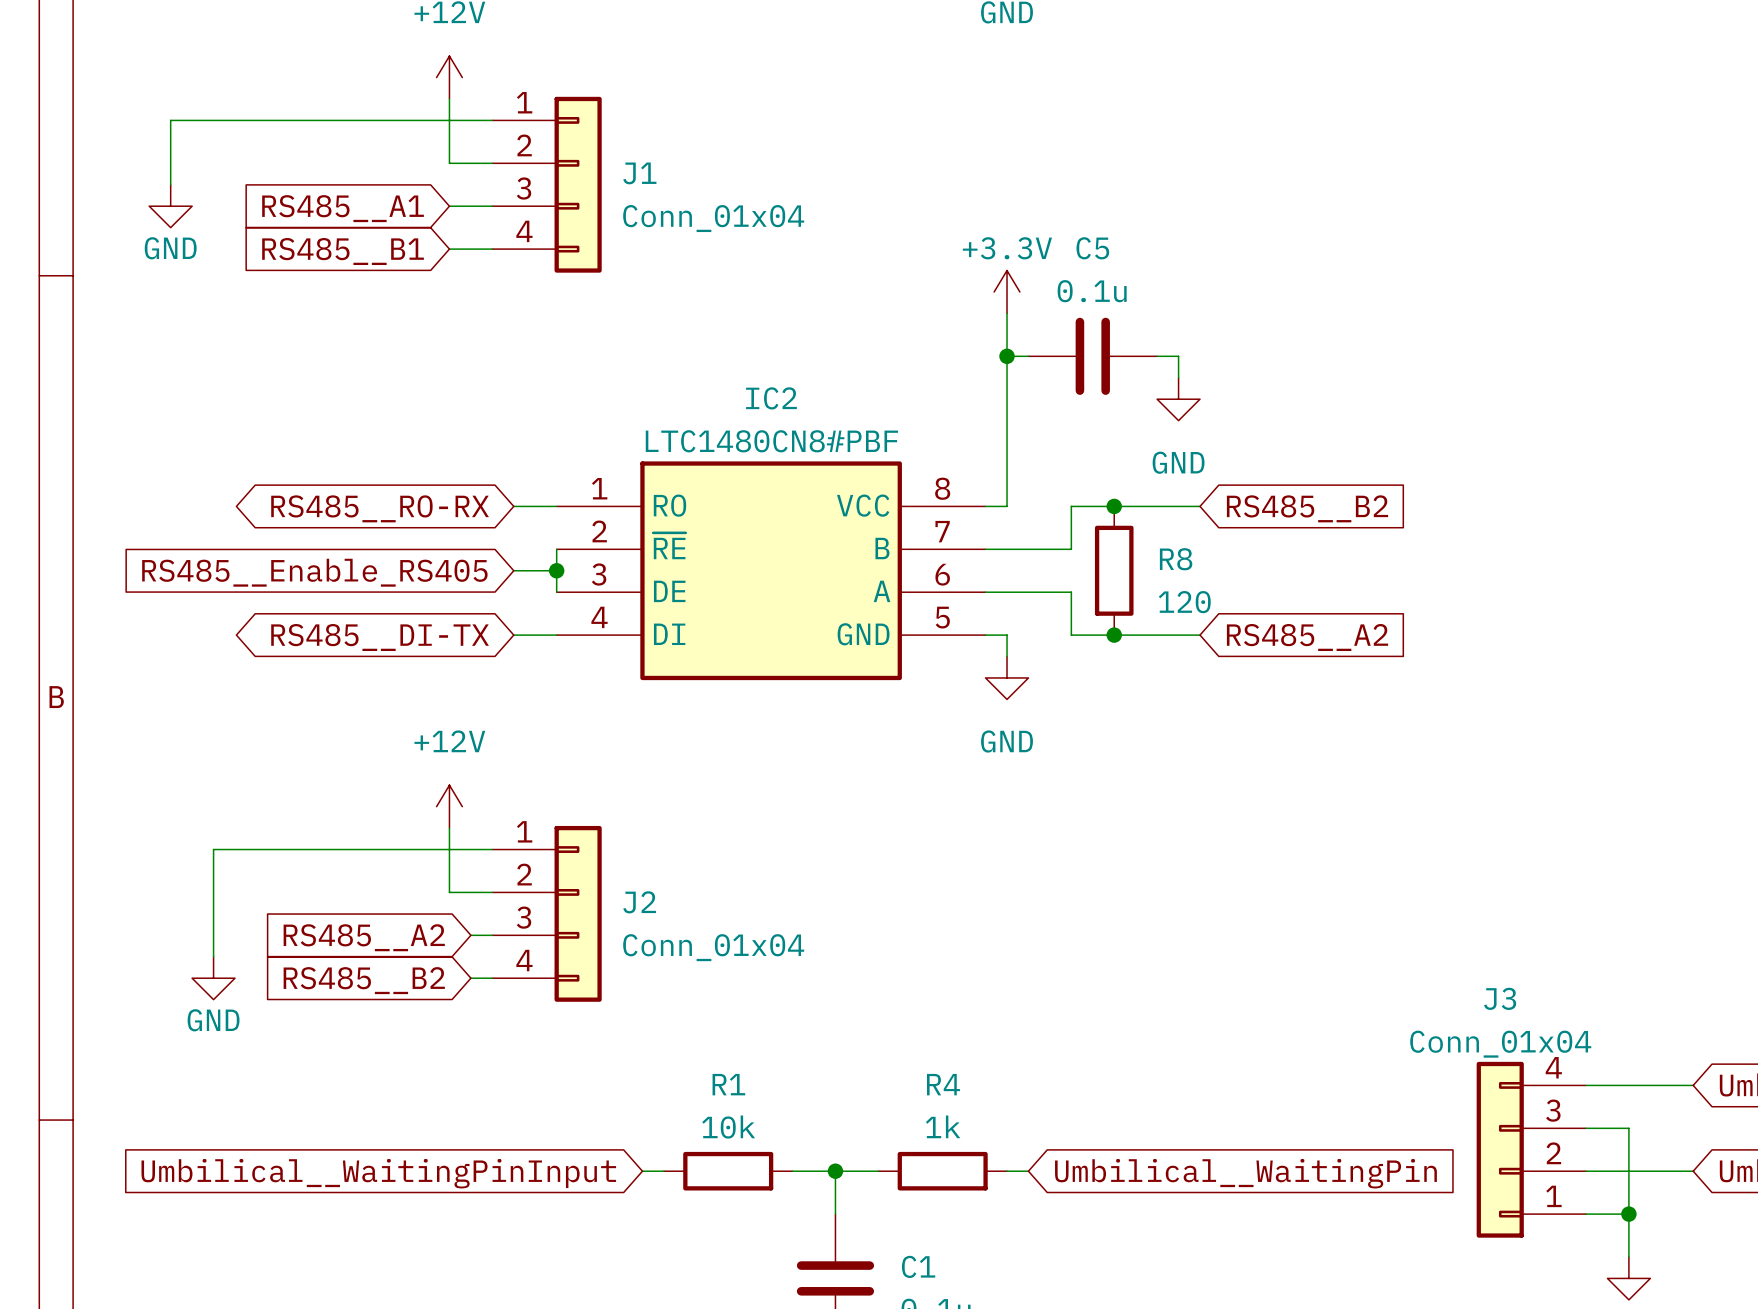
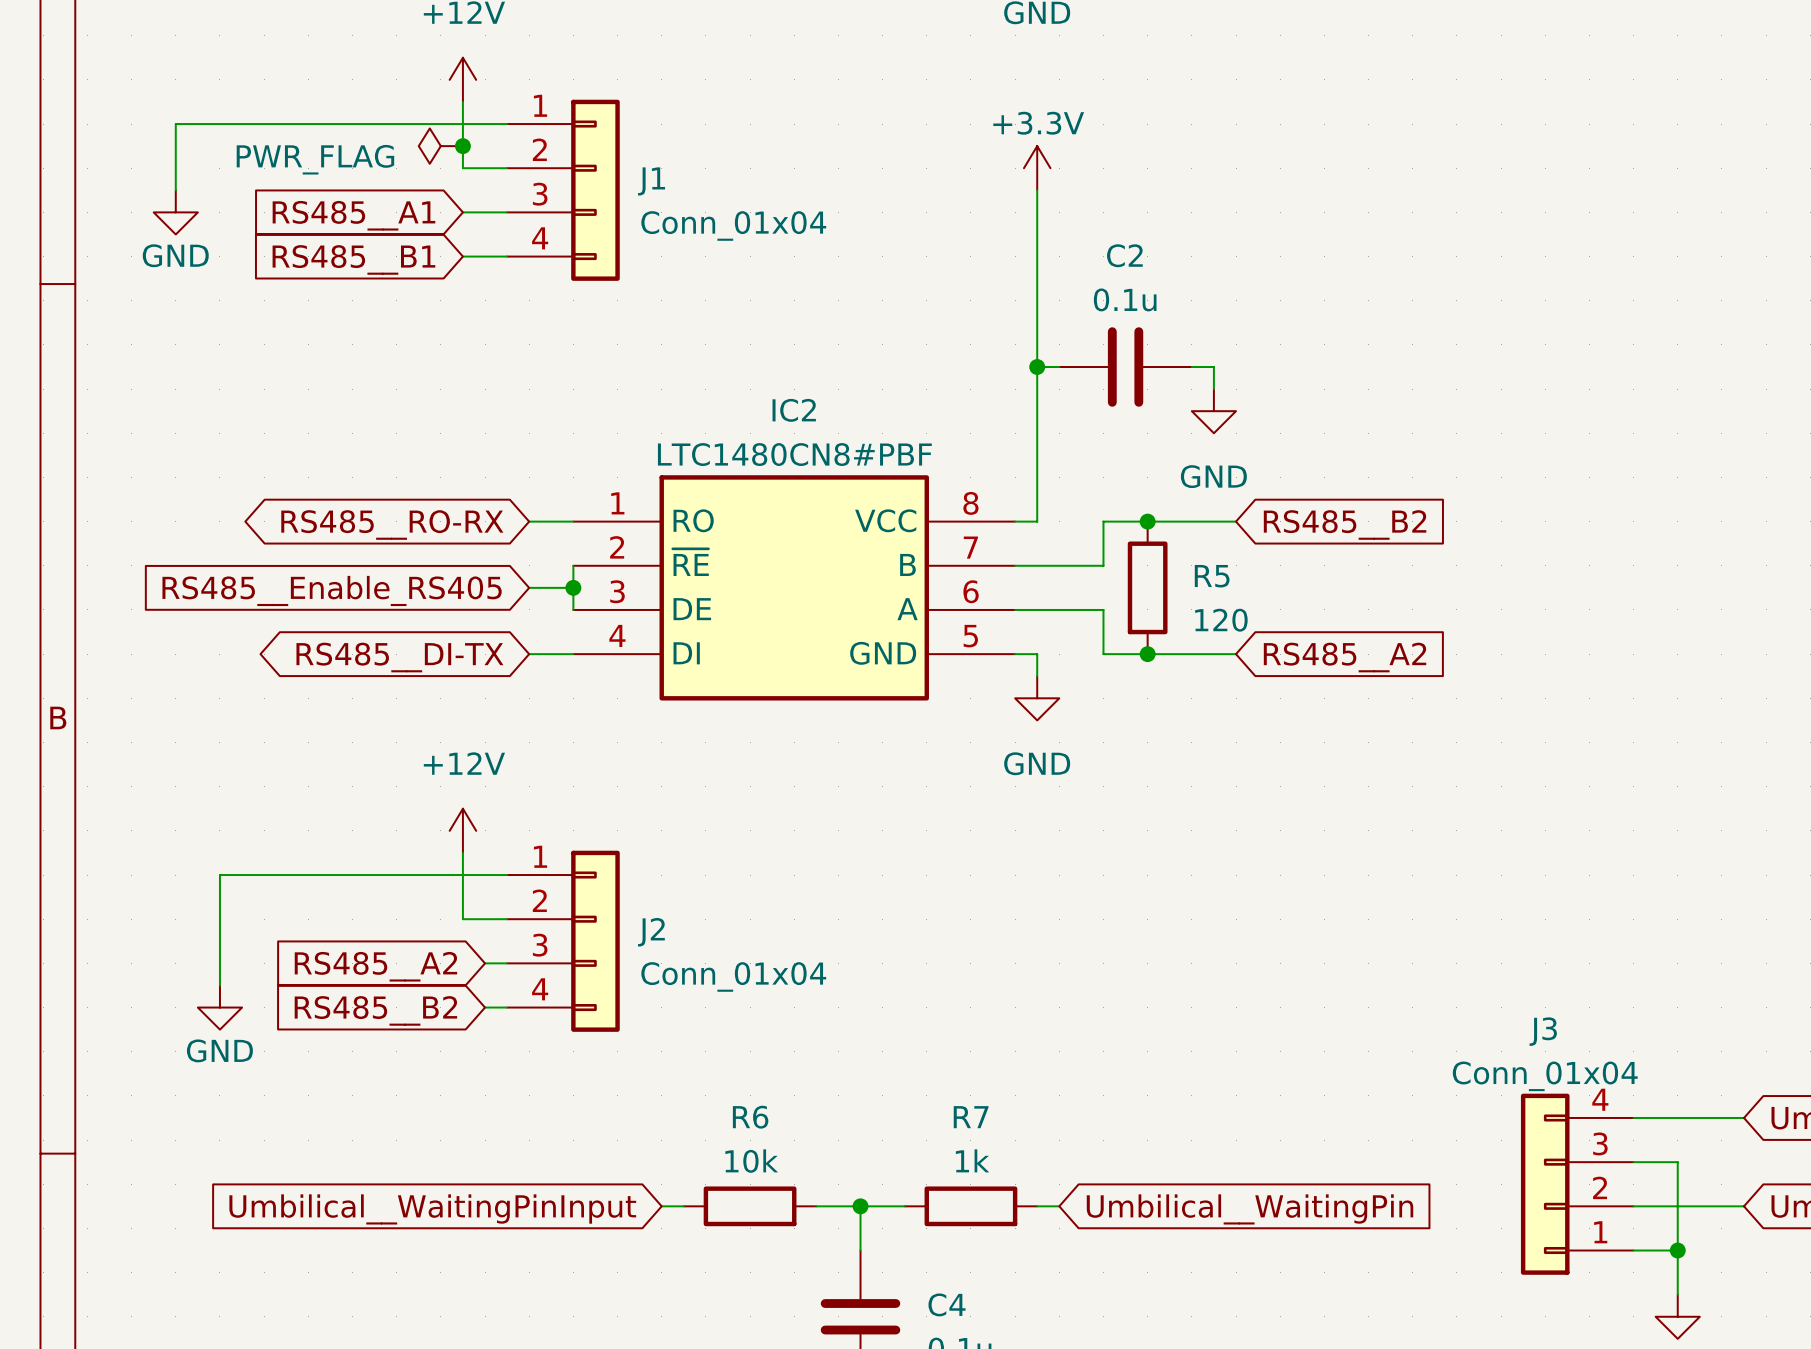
power symbol: none -> PWR_FLAG (440, 146)
junction: none -> (462, 146)
wire: none -> (1037, 190) (1037, 322)
C5 name: C5 (1092, 248) -> C2 (1124, 255)
power symbol position: +3.3V (1007, 291) -> +3.3V (1037, 168)
R8 name: R8 (1176, 559) -> R5 (1212, 576)
R1 name: R1 (728, 1084) -> R6 (750, 1117)
R4 name: R4 (943, 1084) -> R7 (971, 1117)
C1 name: C1 (918, 1266) -> C4 (946, 1304)

